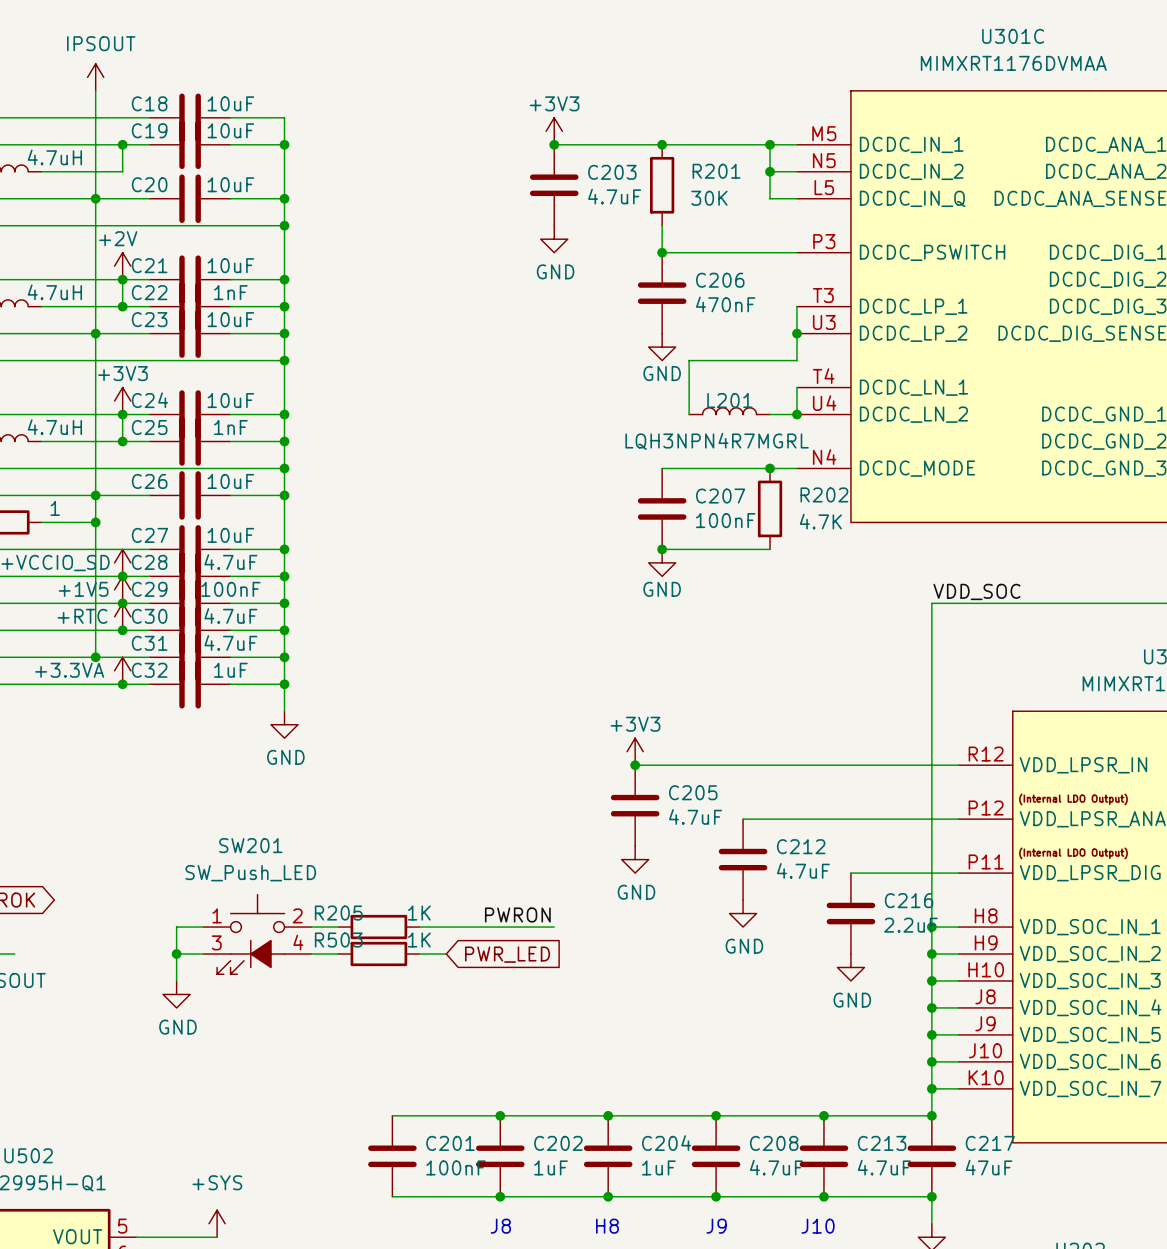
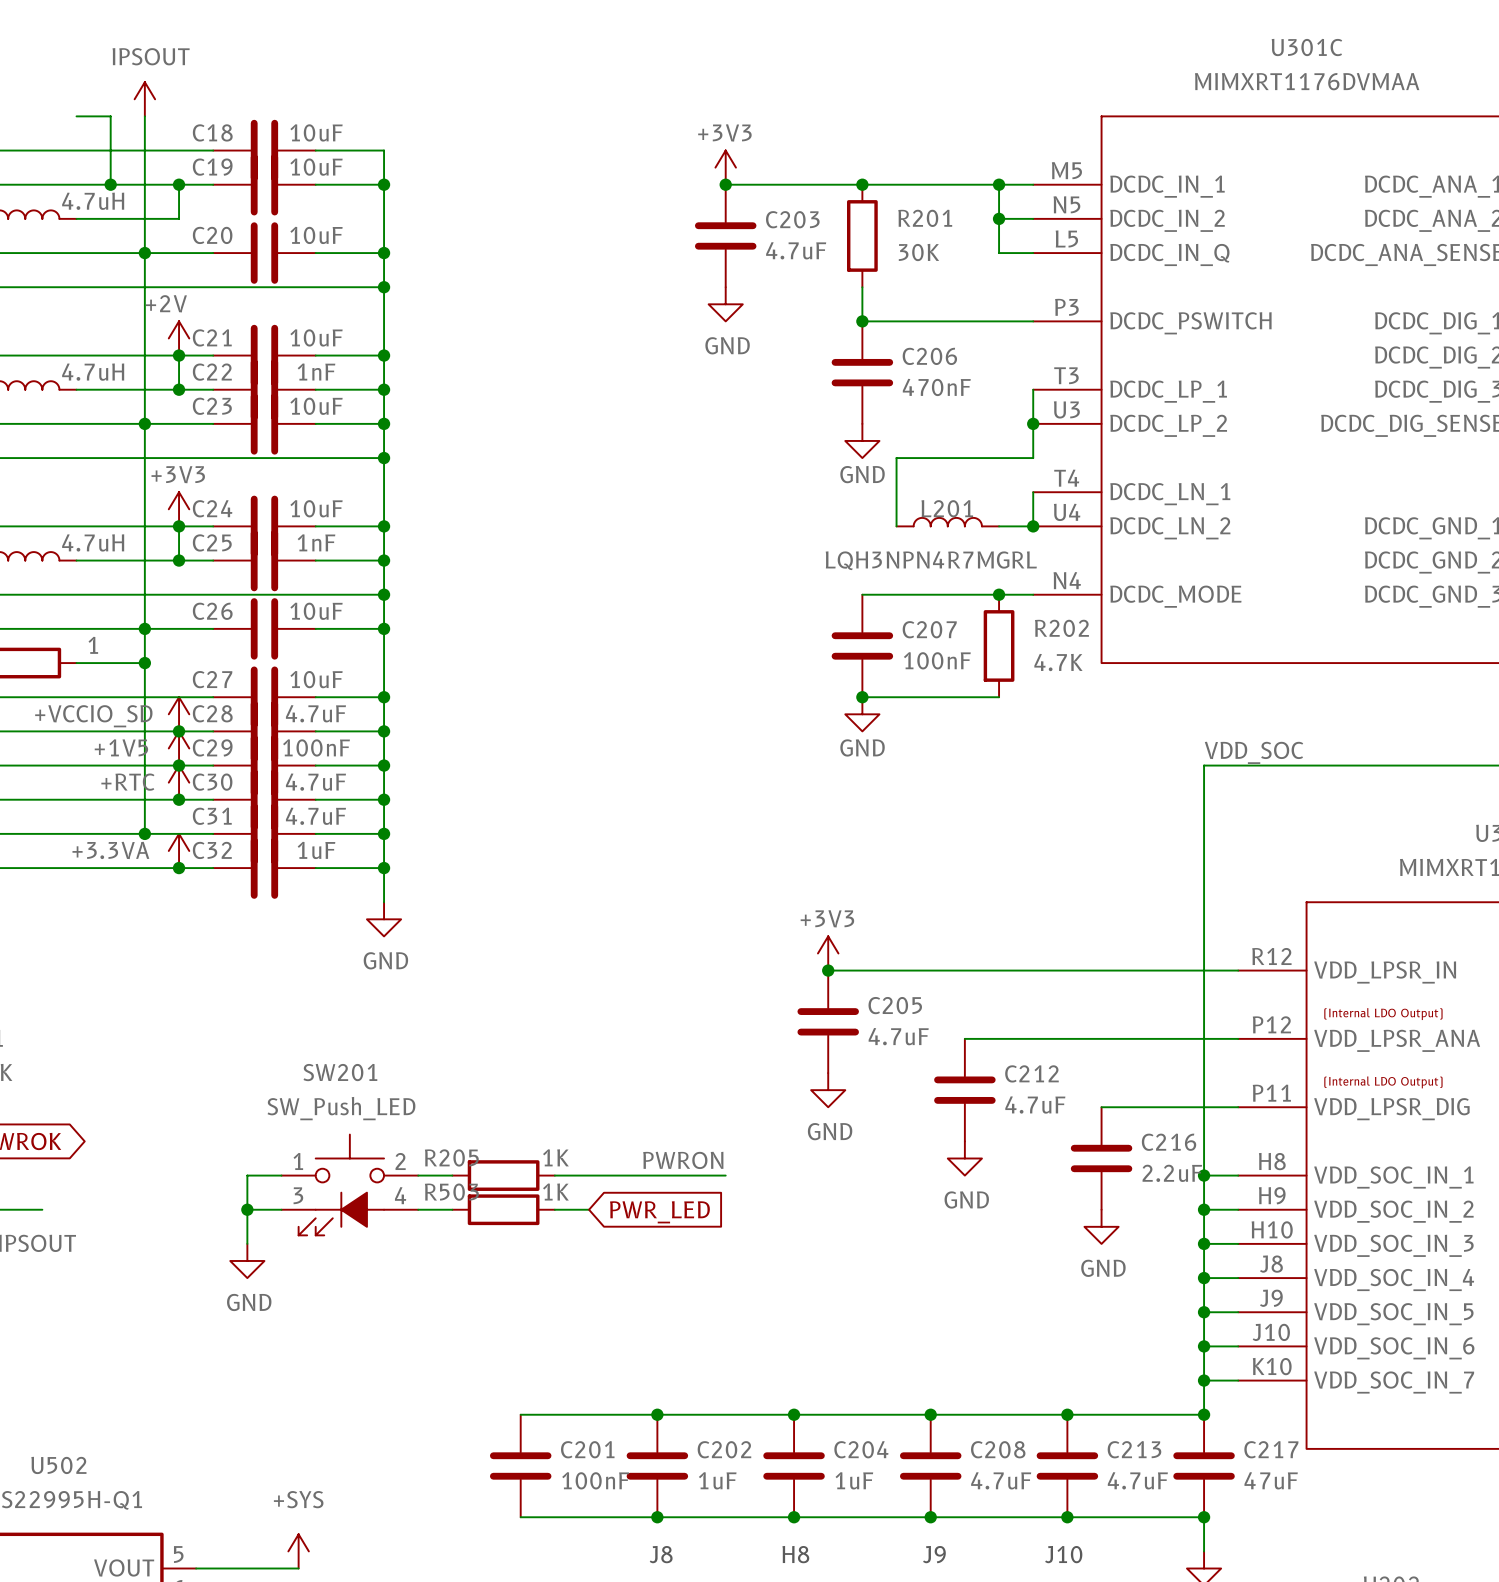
wire: none -> (76, 116) (110, 116) (110, 184)
junction: none -> (110, 184)

